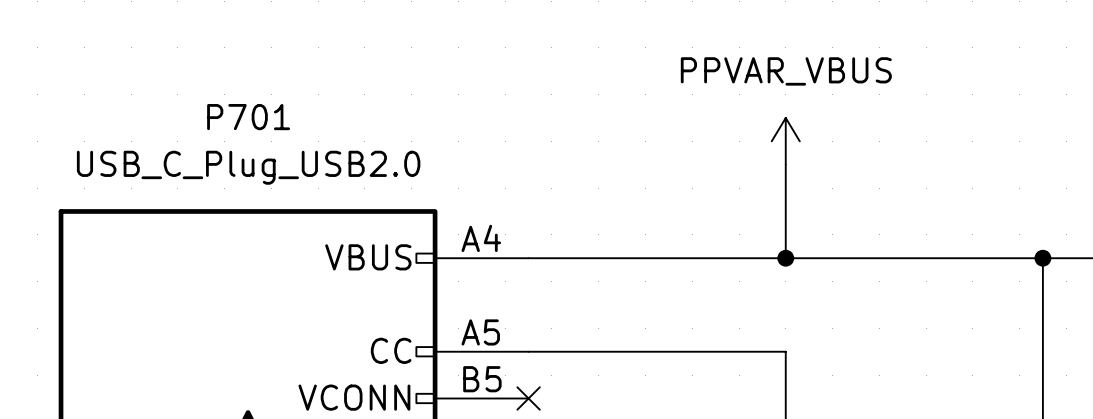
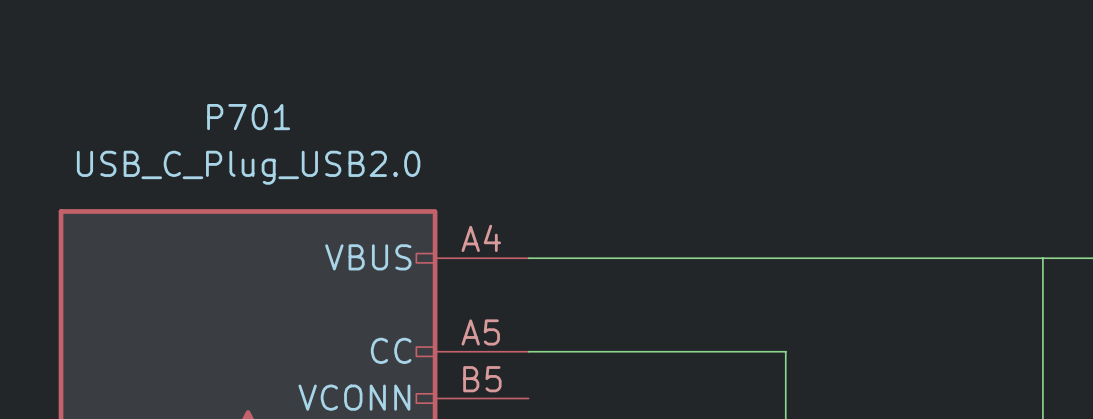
power symbol: PPVAR_VBUS (785, 141) -> none
wire: (785, 164) (785, 258) -> none
junction: (785, 258) -> none
junction: (1042, 258) -> none
no-connect mark: (528, 398) -> none

